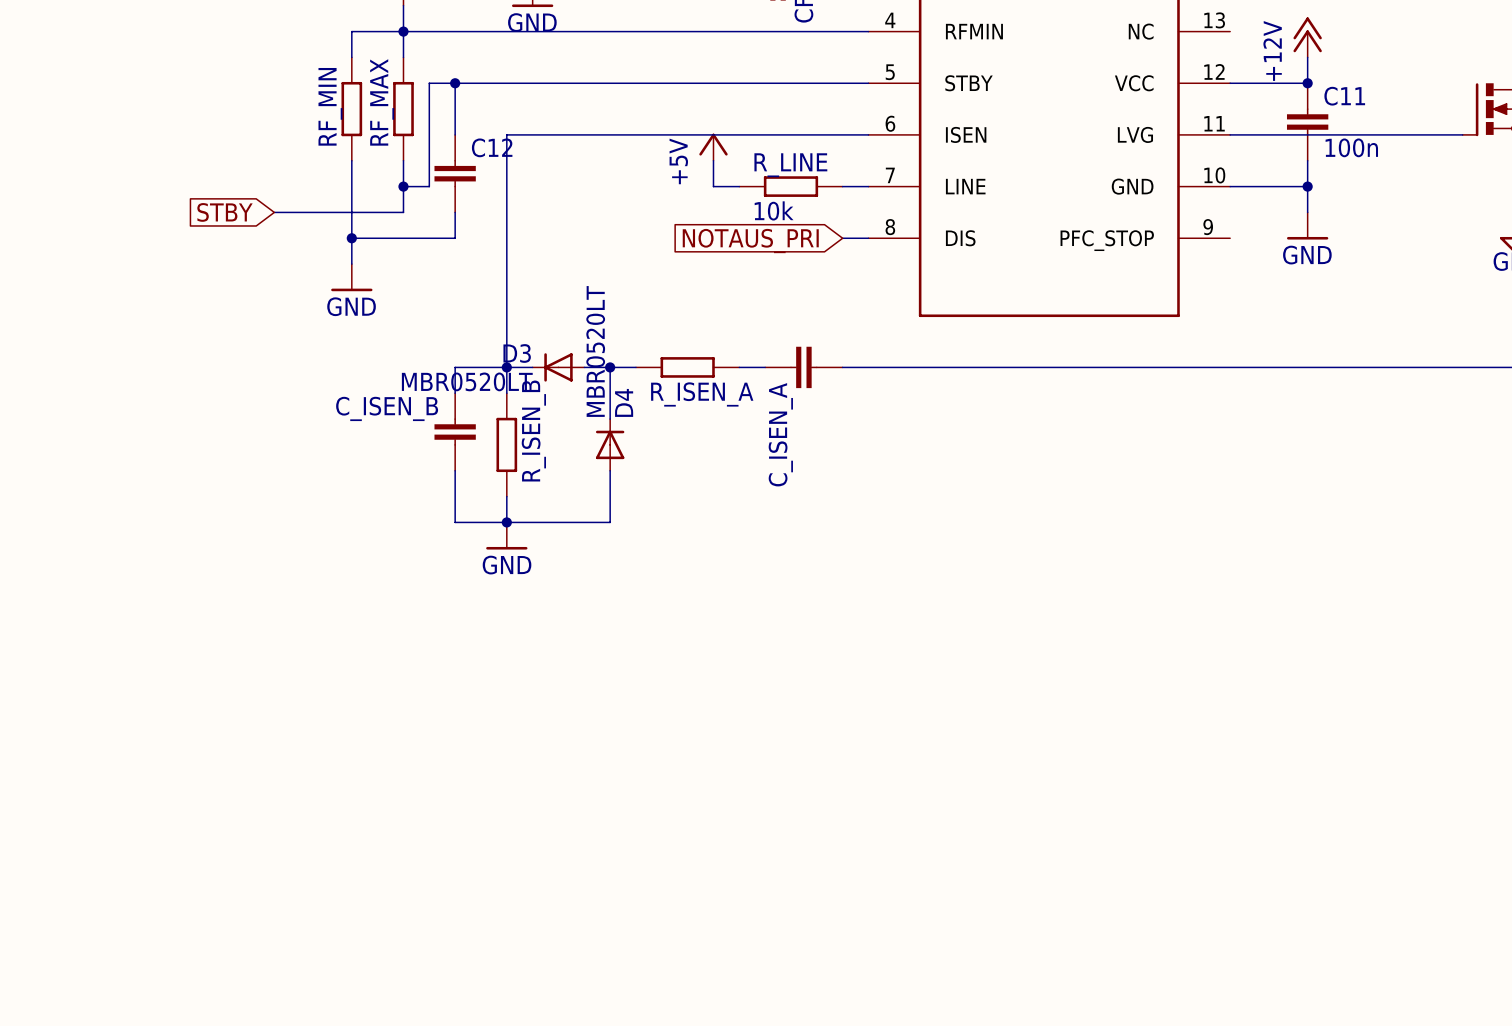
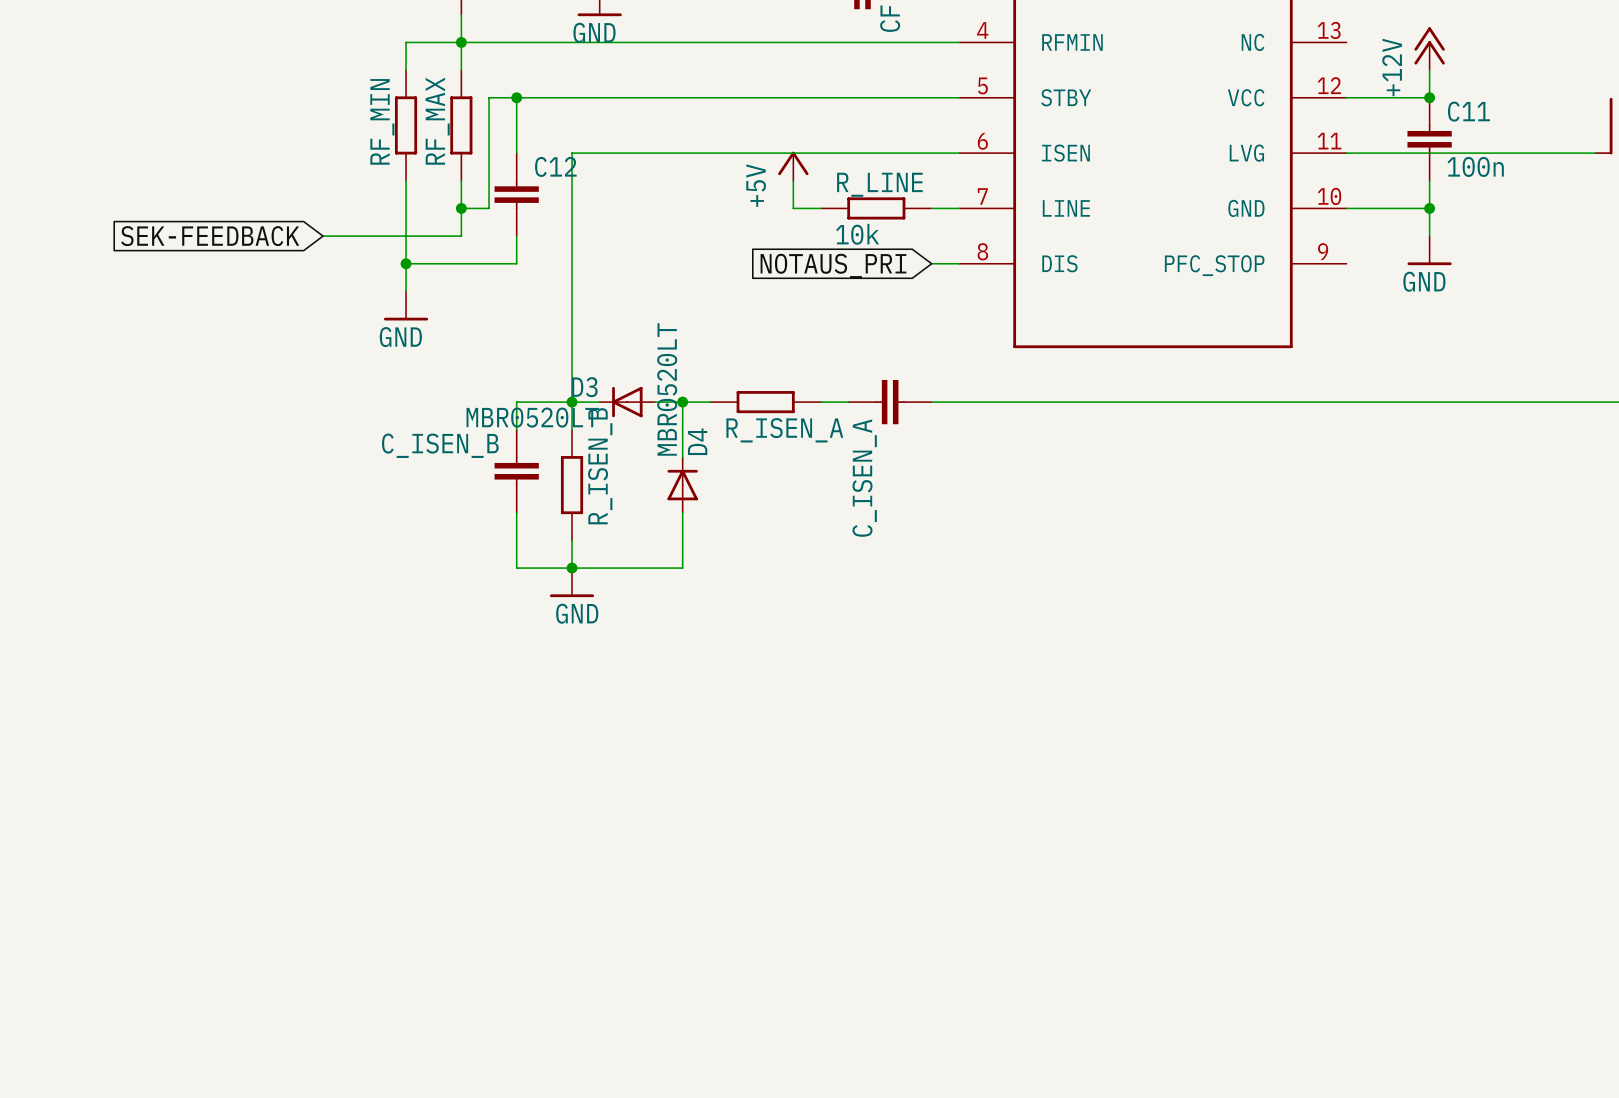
global label: STBY (225, 212) -> SEK-FEEDBACK (210, 236)

